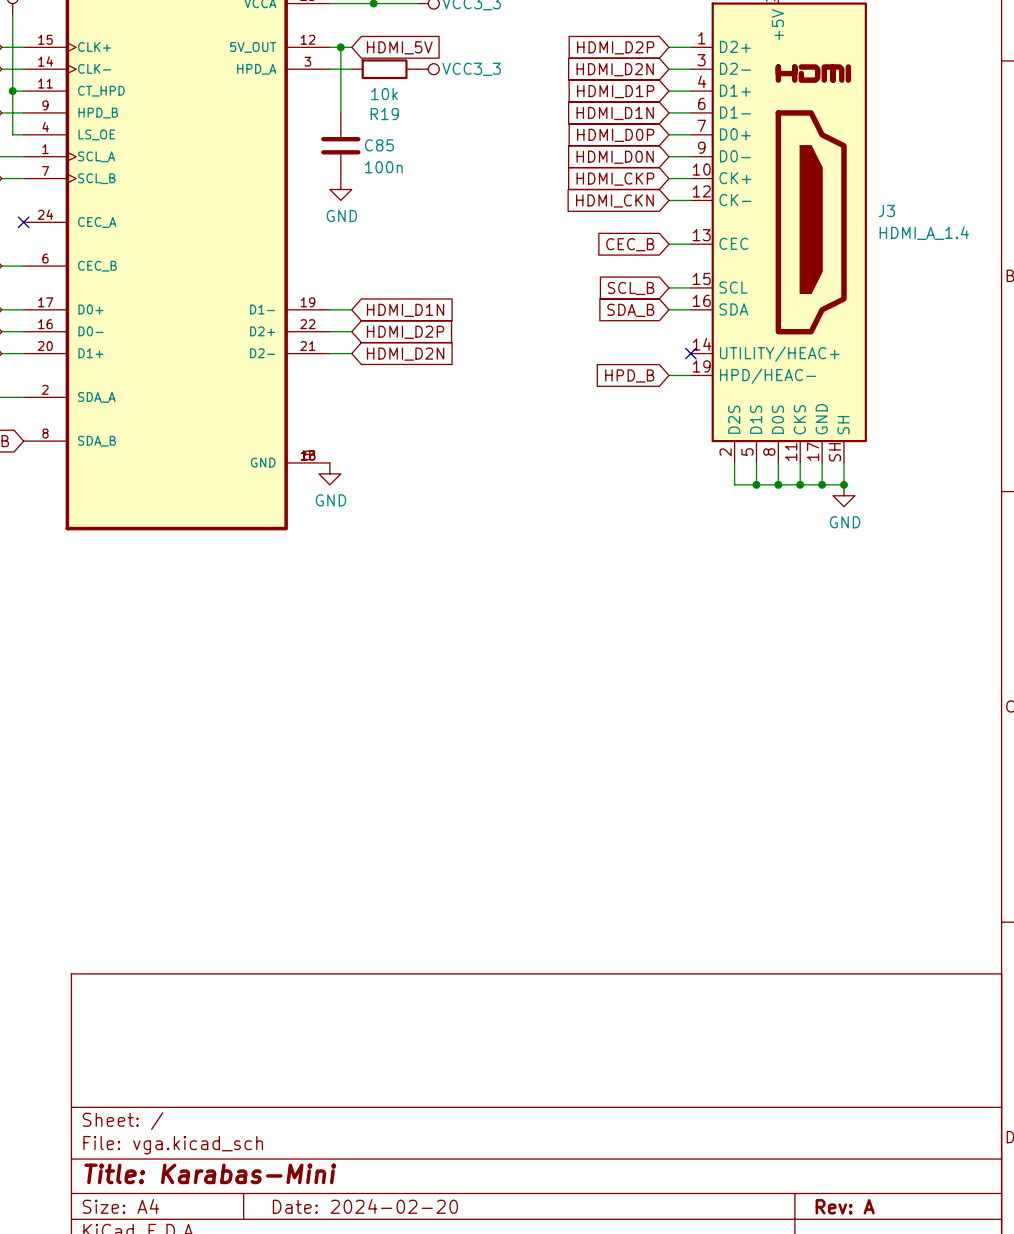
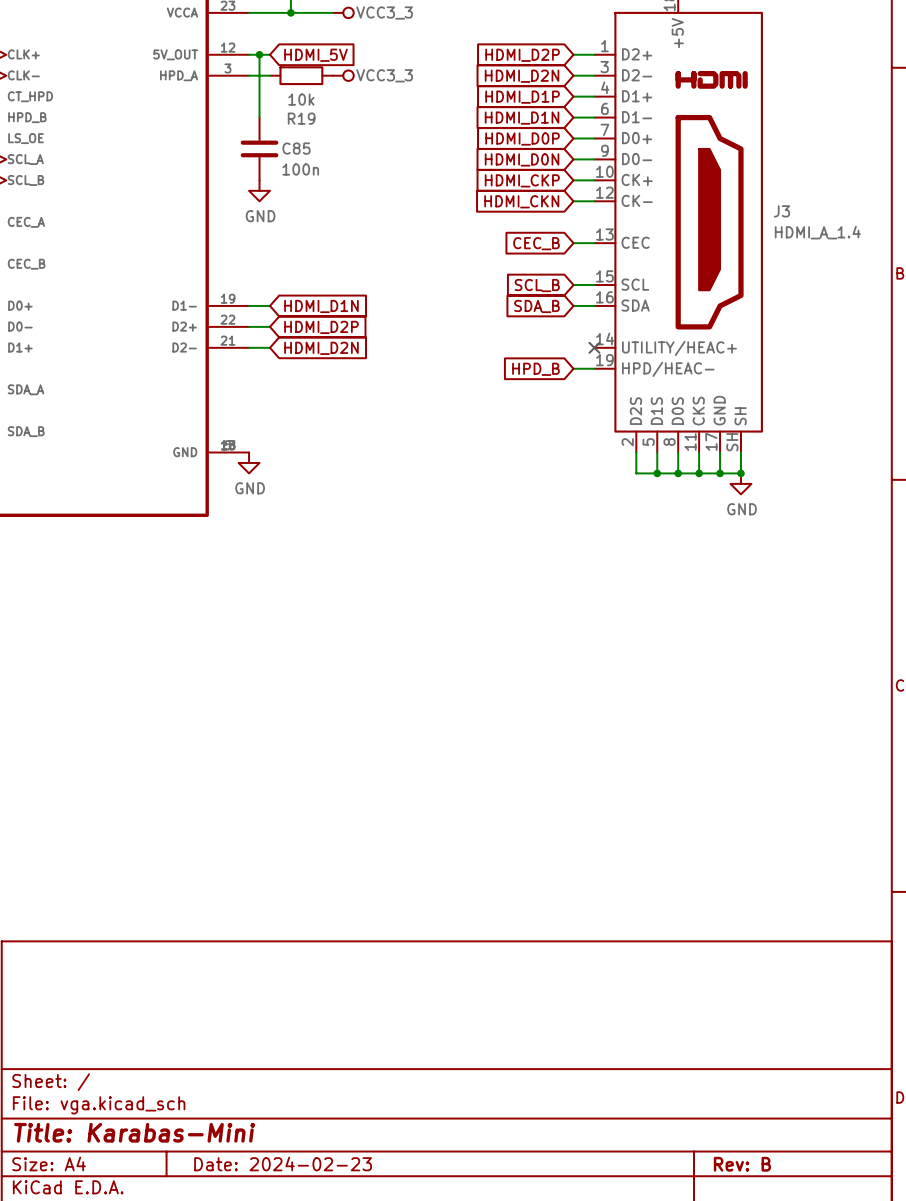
title block: Date: 2024-02-20 (365, 1206) -> Date: 2024-02-23 (283, 1163)
title block: Rev: A (845, 1206) -> Rev: B (742, 1164)

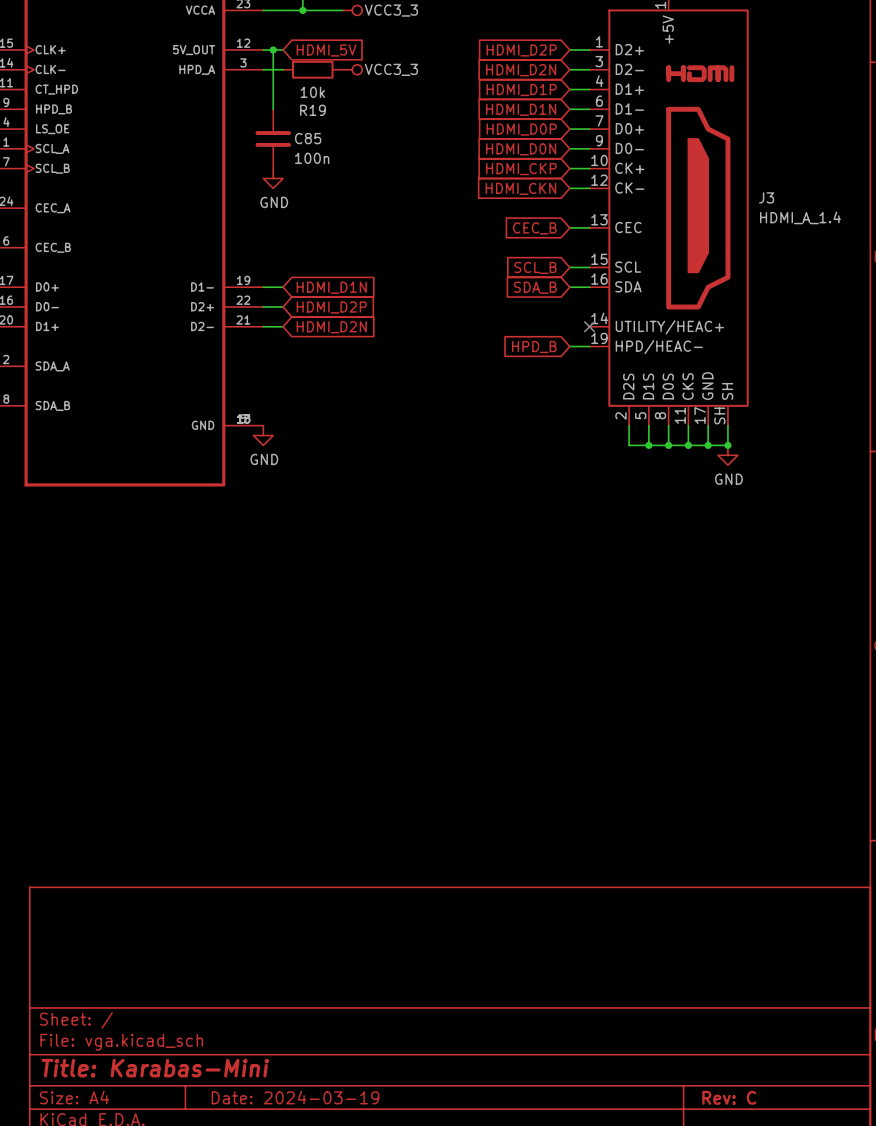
title block: Date: 2024-02-23 (283, 1163) -> Date: 2024-03-19 (295, 1097)
title block: Rev: B (742, 1164) -> Rev: C (729, 1097)

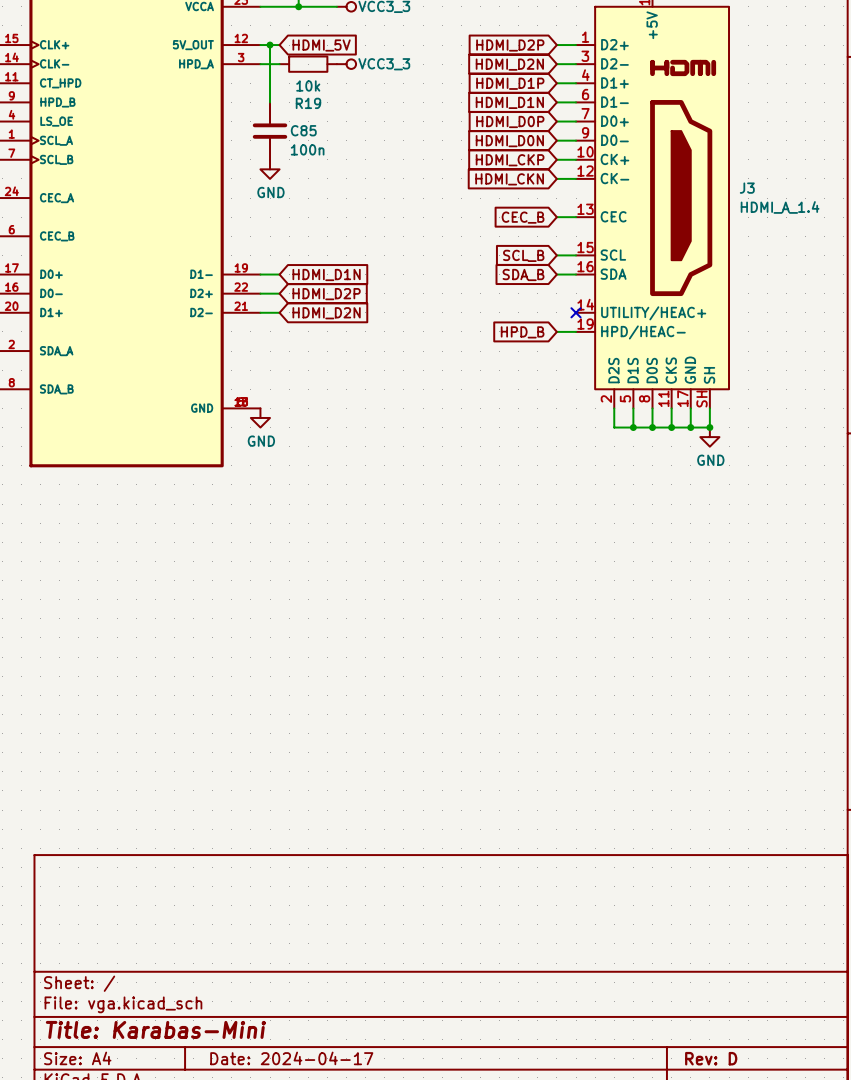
title block: Date: 2024-03-19 (295, 1097) -> Date: 2024-04-17 (291, 1058)
title block: Rev: C (729, 1097) -> Rev: D (711, 1058)

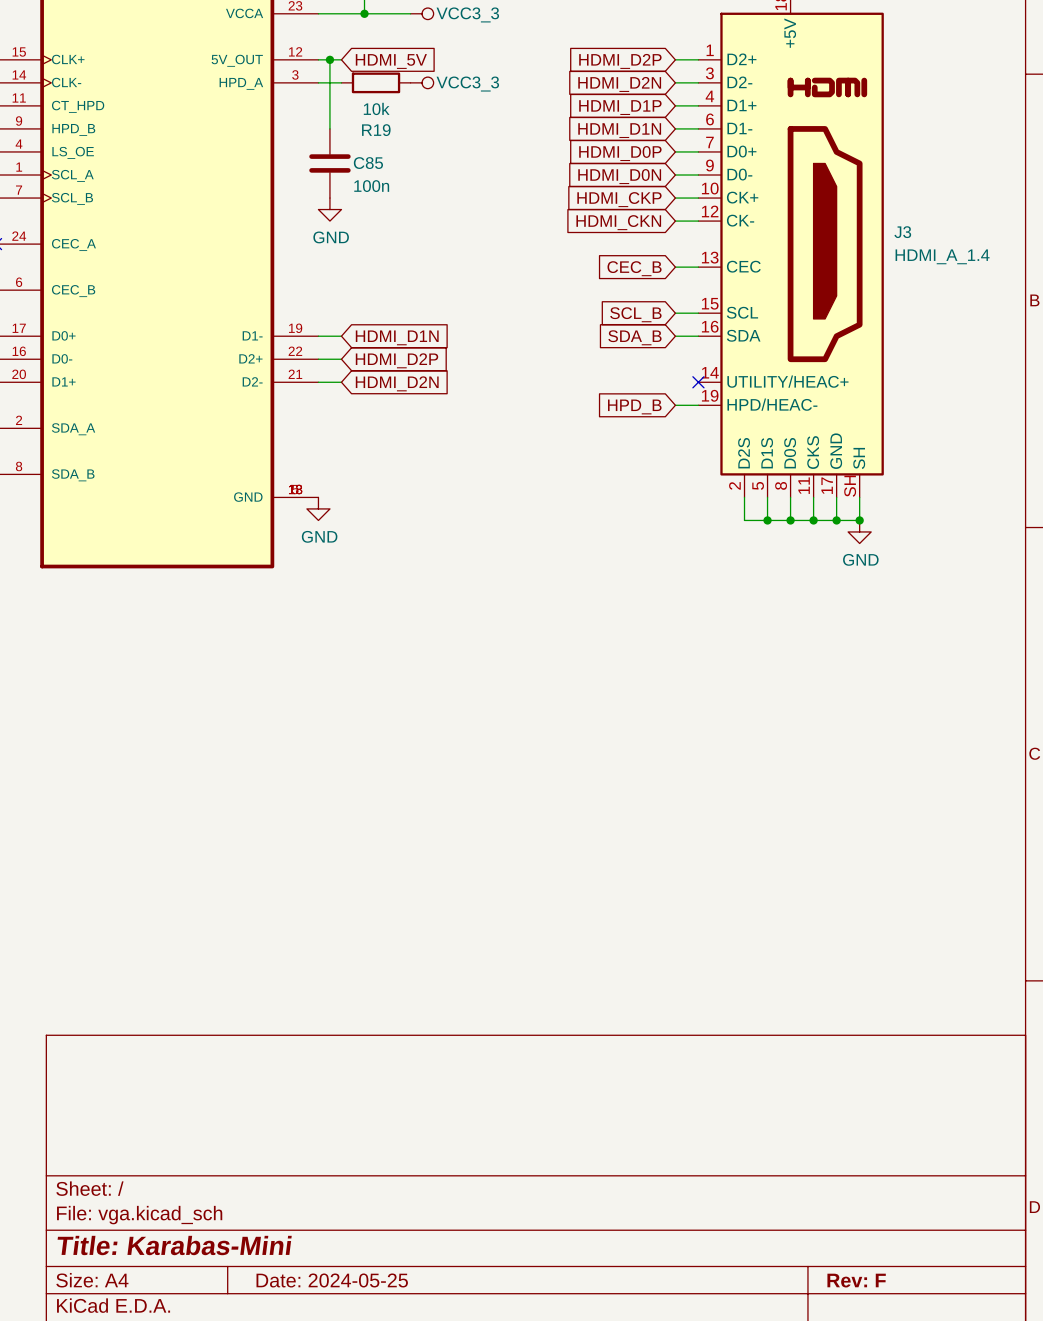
title block: Date: 2024-04-17 (291, 1058) -> Date: 2024-05-25 (332, 1280)
title block: Rev: D (711, 1058) -> Rev: F (856, 1280)

